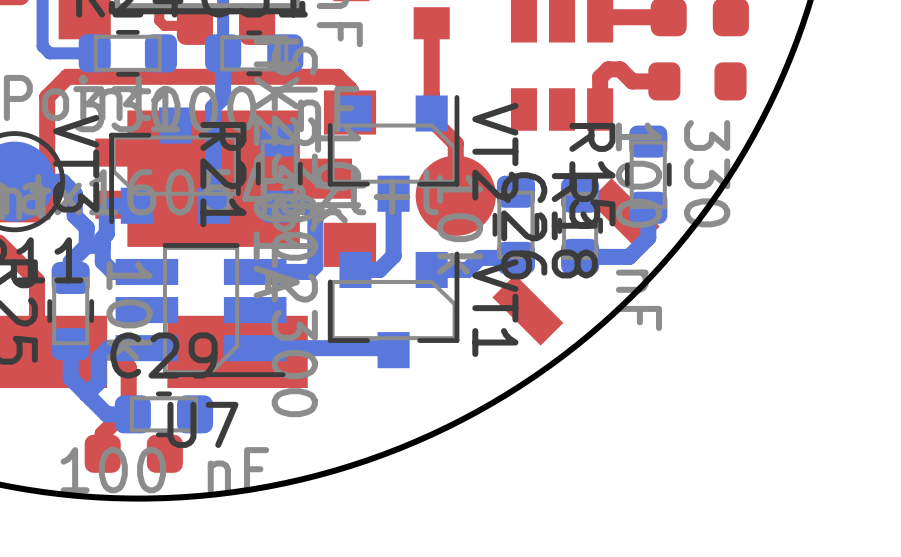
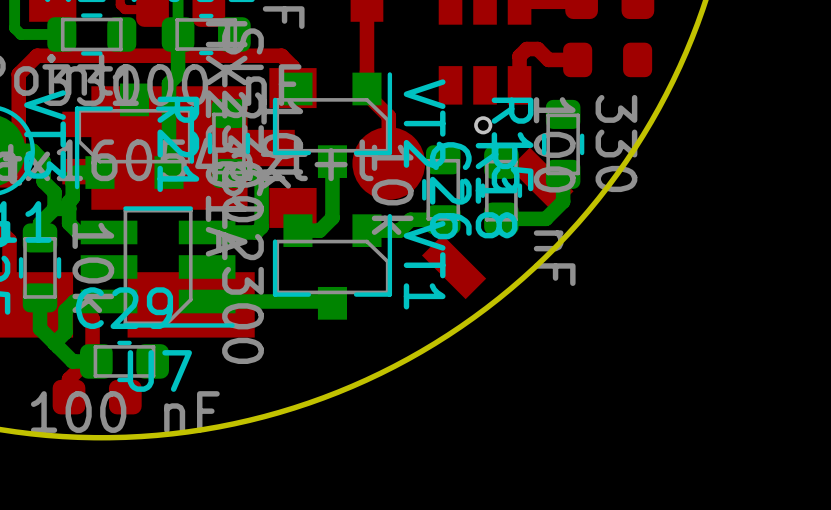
via: none -> (483, 125)

